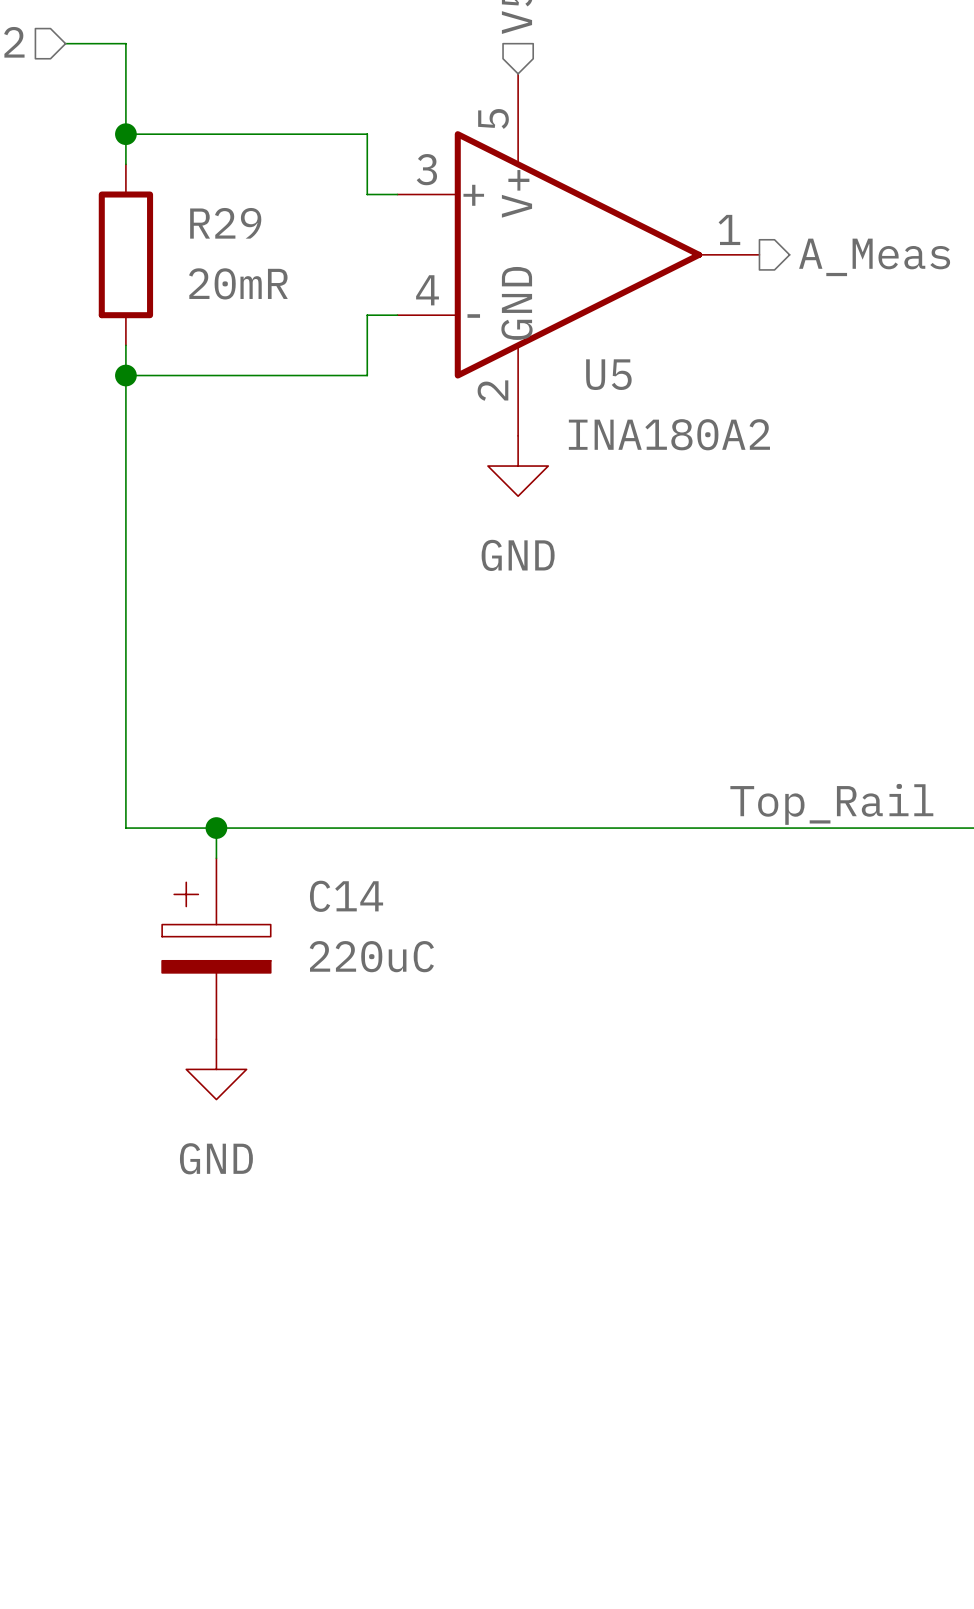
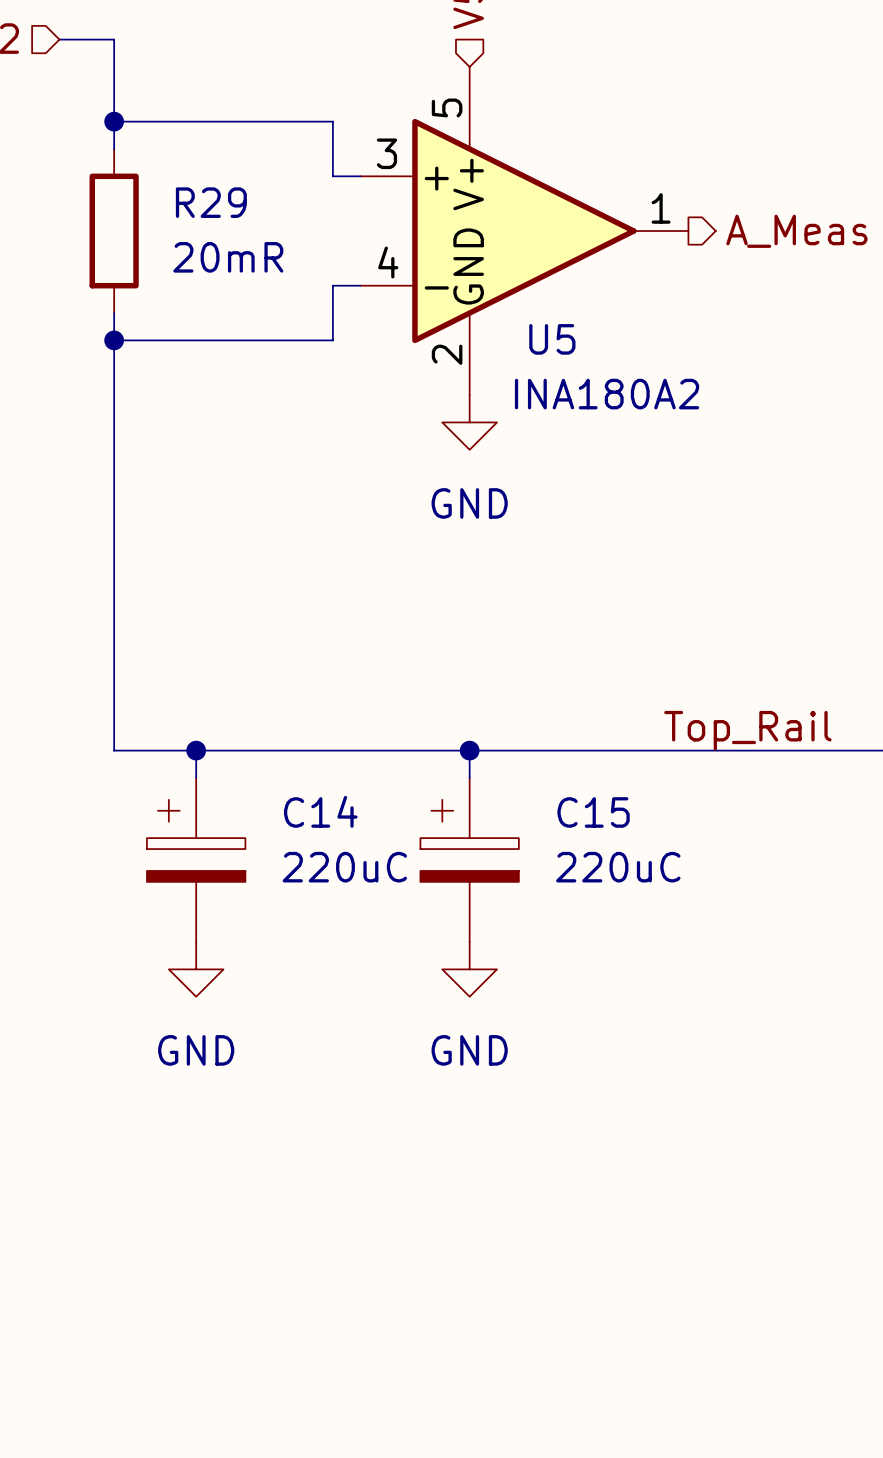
wire: none -> (469, 750) (469, 777)
junction: none -> (469, 750)
C15: none -> 220uC (469, 859)
power symbol: none -> GND (469, 969)

